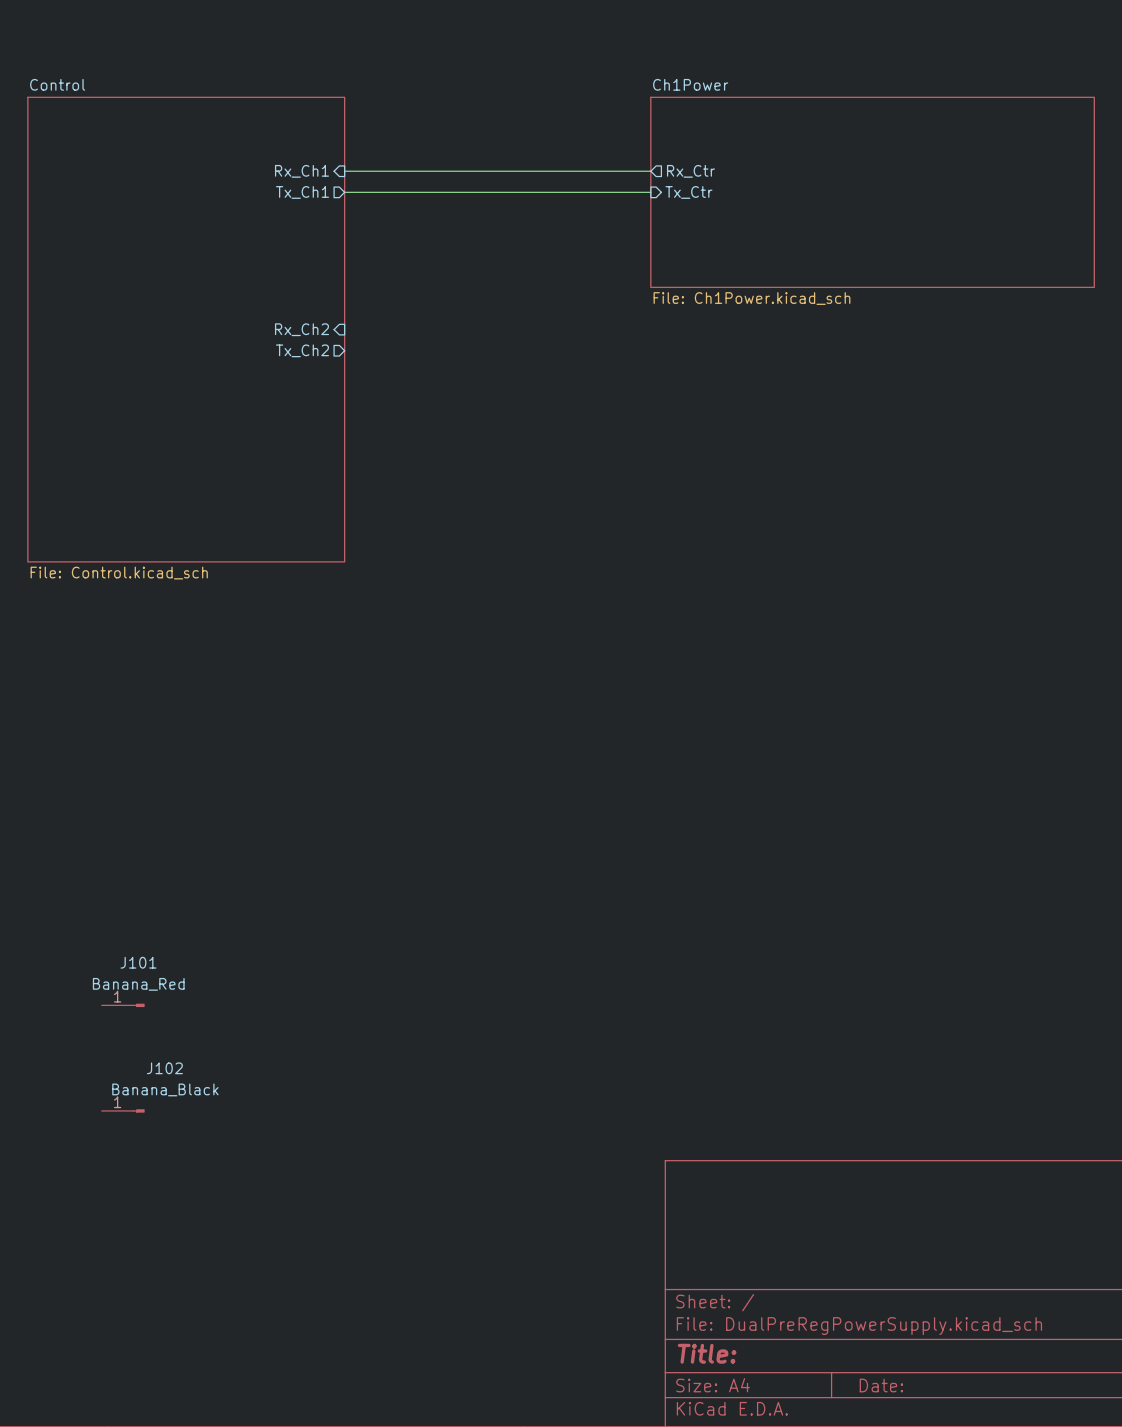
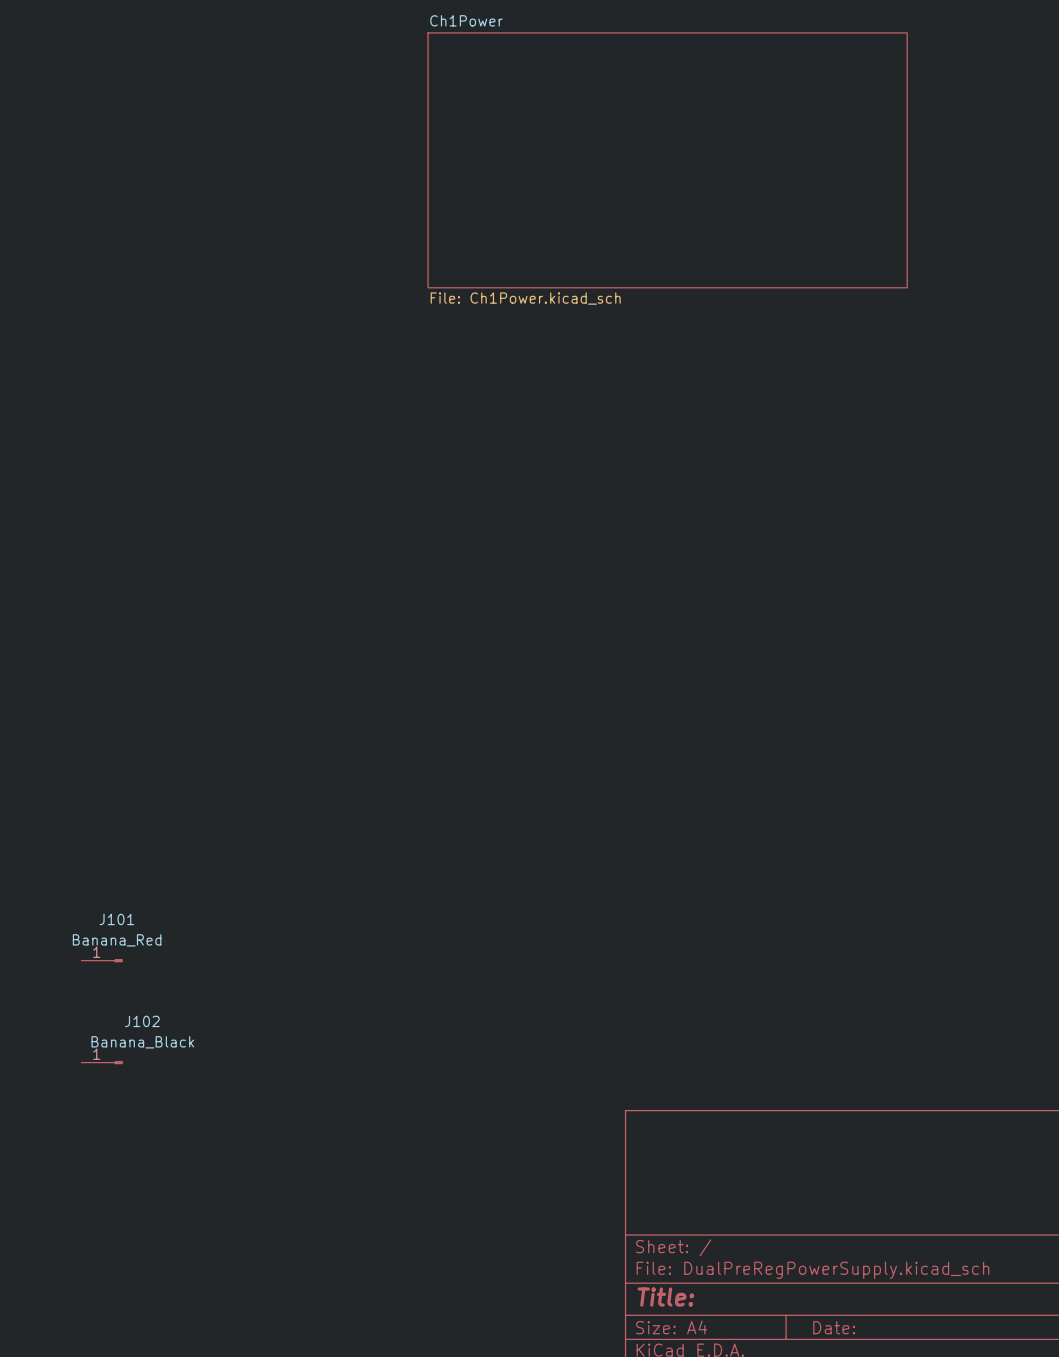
sheet Ch1Power name position: Ch1Power (690, 84) -> Ch1Power (466, 20)
sheet Ch1Power shape: [650, 96, 1095, 289] -> [427, 32, 908, 289]
sheet pin: Rx_Ch1 (301, 171) -> none
wire: (344, 171) (650, 171) -> none
sheet pin: Rx_Ctr (690, 171) -> none
sheet pin: Tx_Ch1 (302, 192) -> none
wire: (344, 192) (650, 192) -> none
sheet pin: Tx_Ctr (688, 192) -> none
sheet Ch1Power value position: File: Ch1Power.kicad_sch (751, 298) -> File: Ch1Power.kicad_sch (525, 298)
sheet Control: File: Control.kicad_sch (186, 329) -> none
sheet pin: Rx_Ch2 (301, 329) -> none
sheet pin: Tx_Ch2 (302, 350) -> none

